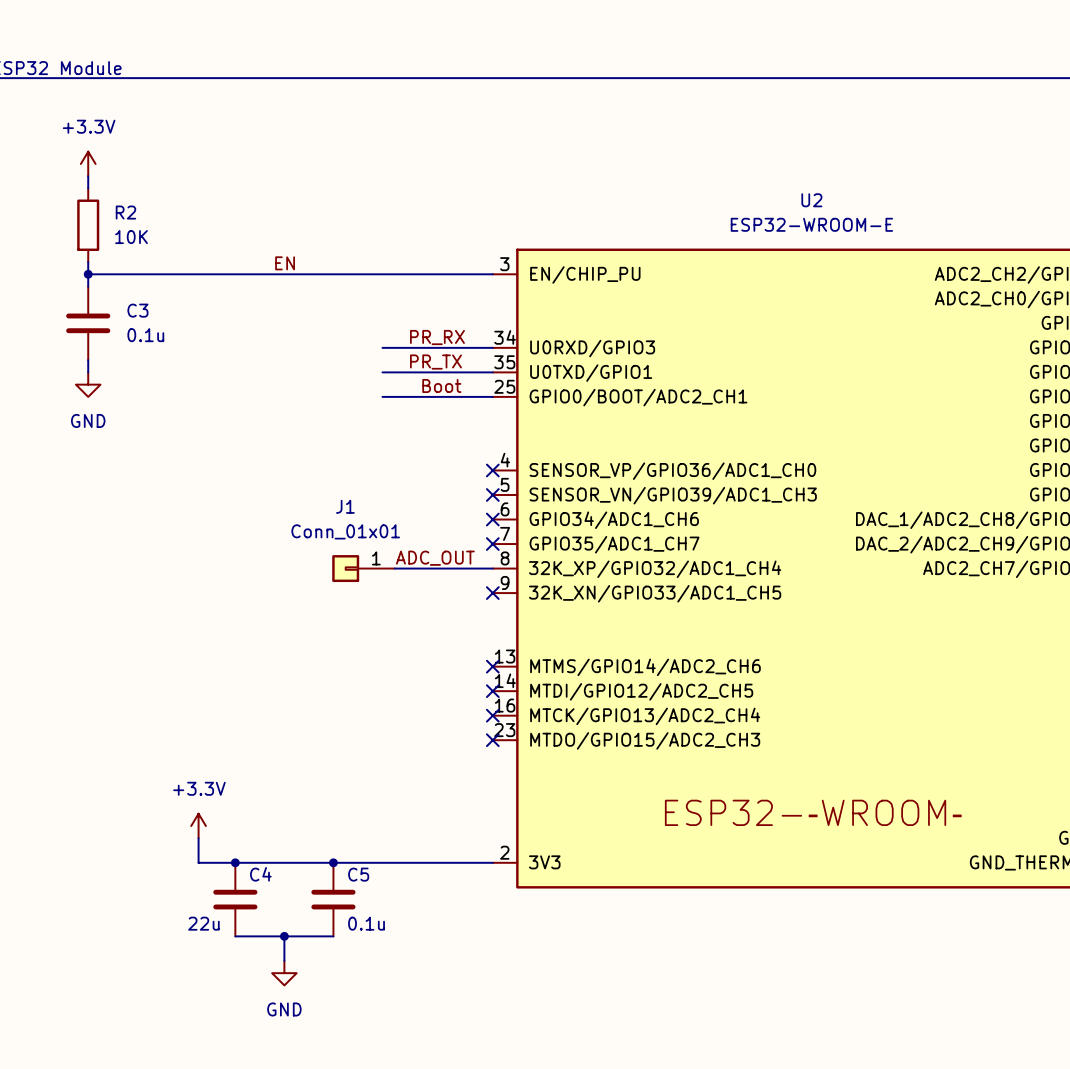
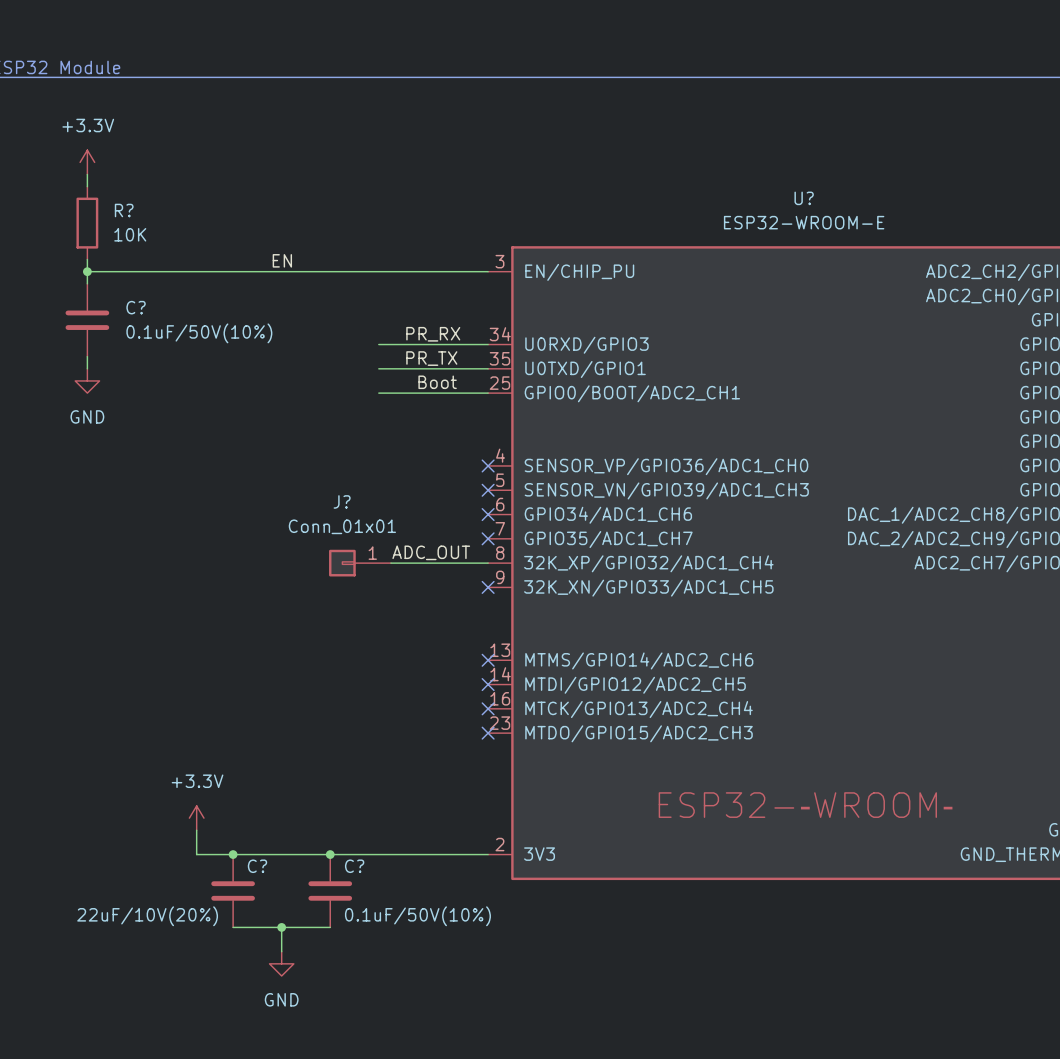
U2 name: U2 (811, 200) -> U? (804, 198)
R2 name: R2 (125, 212) -> R? (124, 210)
C3 name: C3 (137, 310) -> C? (136, 307)
C3 value: 0.1u (145, 335) -> 0.1uF/50V(10%) (199, 333)
J1 name: J1 (345, 506) -> J? (342, 501)
C4 name: C4 (260, 874) -> C? (257, 866)
C5 name: C5 (358, 874) -> C? (354, 866)
C4 value: 22u (203, 923) -> 22uF/10V(20%) (147, 916)
C5 value: 0.1u (366, 923) -> 0.1uF/50V(10%) (417, 916)

